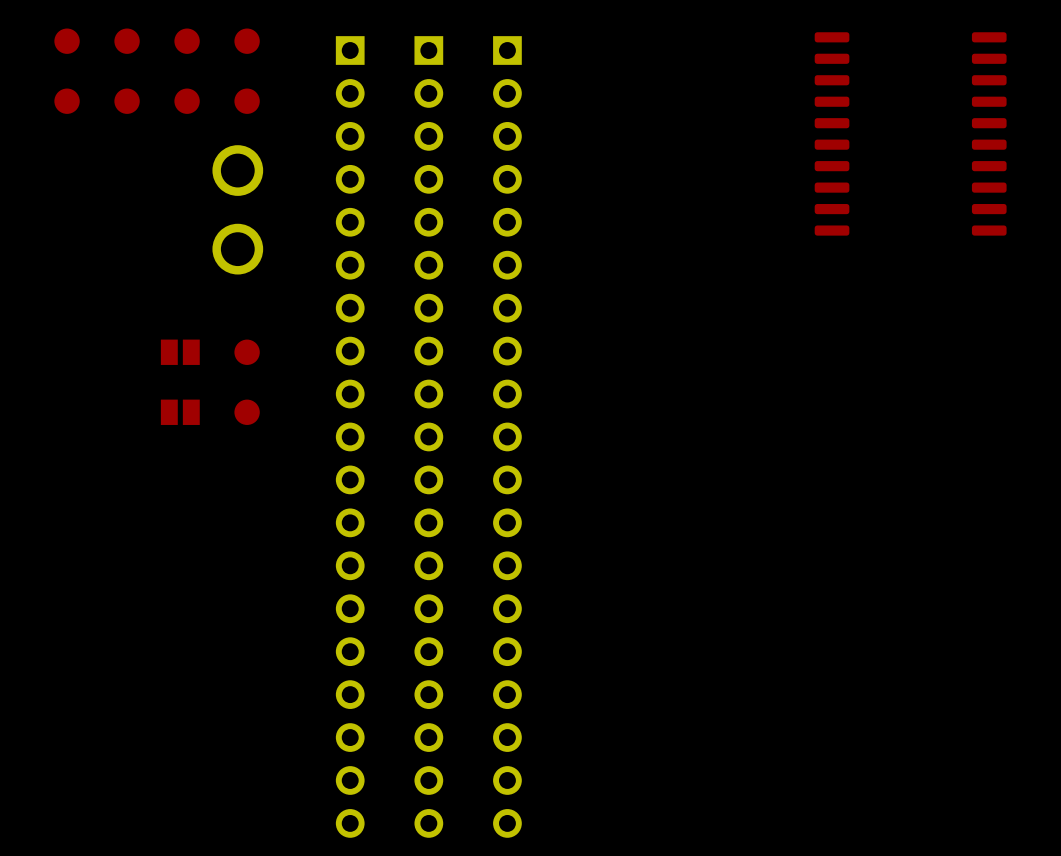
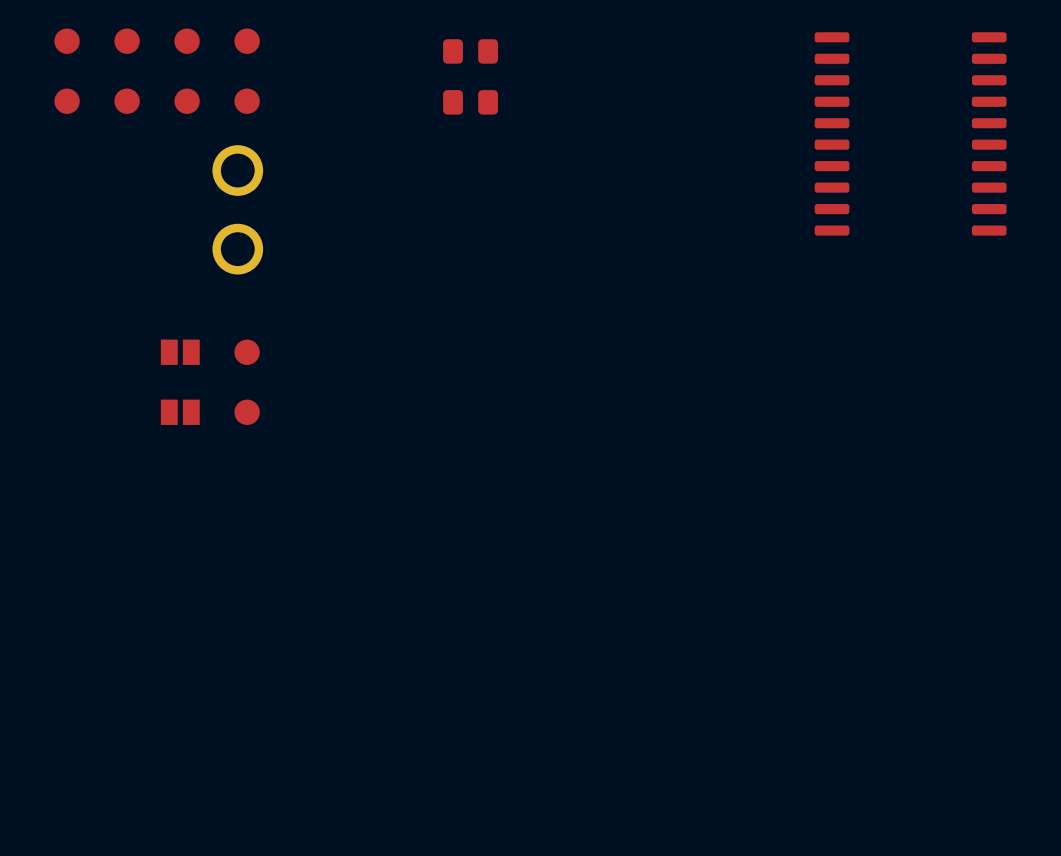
part: none -> (470, 51)
part: none -> (470, 102)
part: (350, 436) -> none
part: (428, 436) -> none
part: (507, 436) -> none

